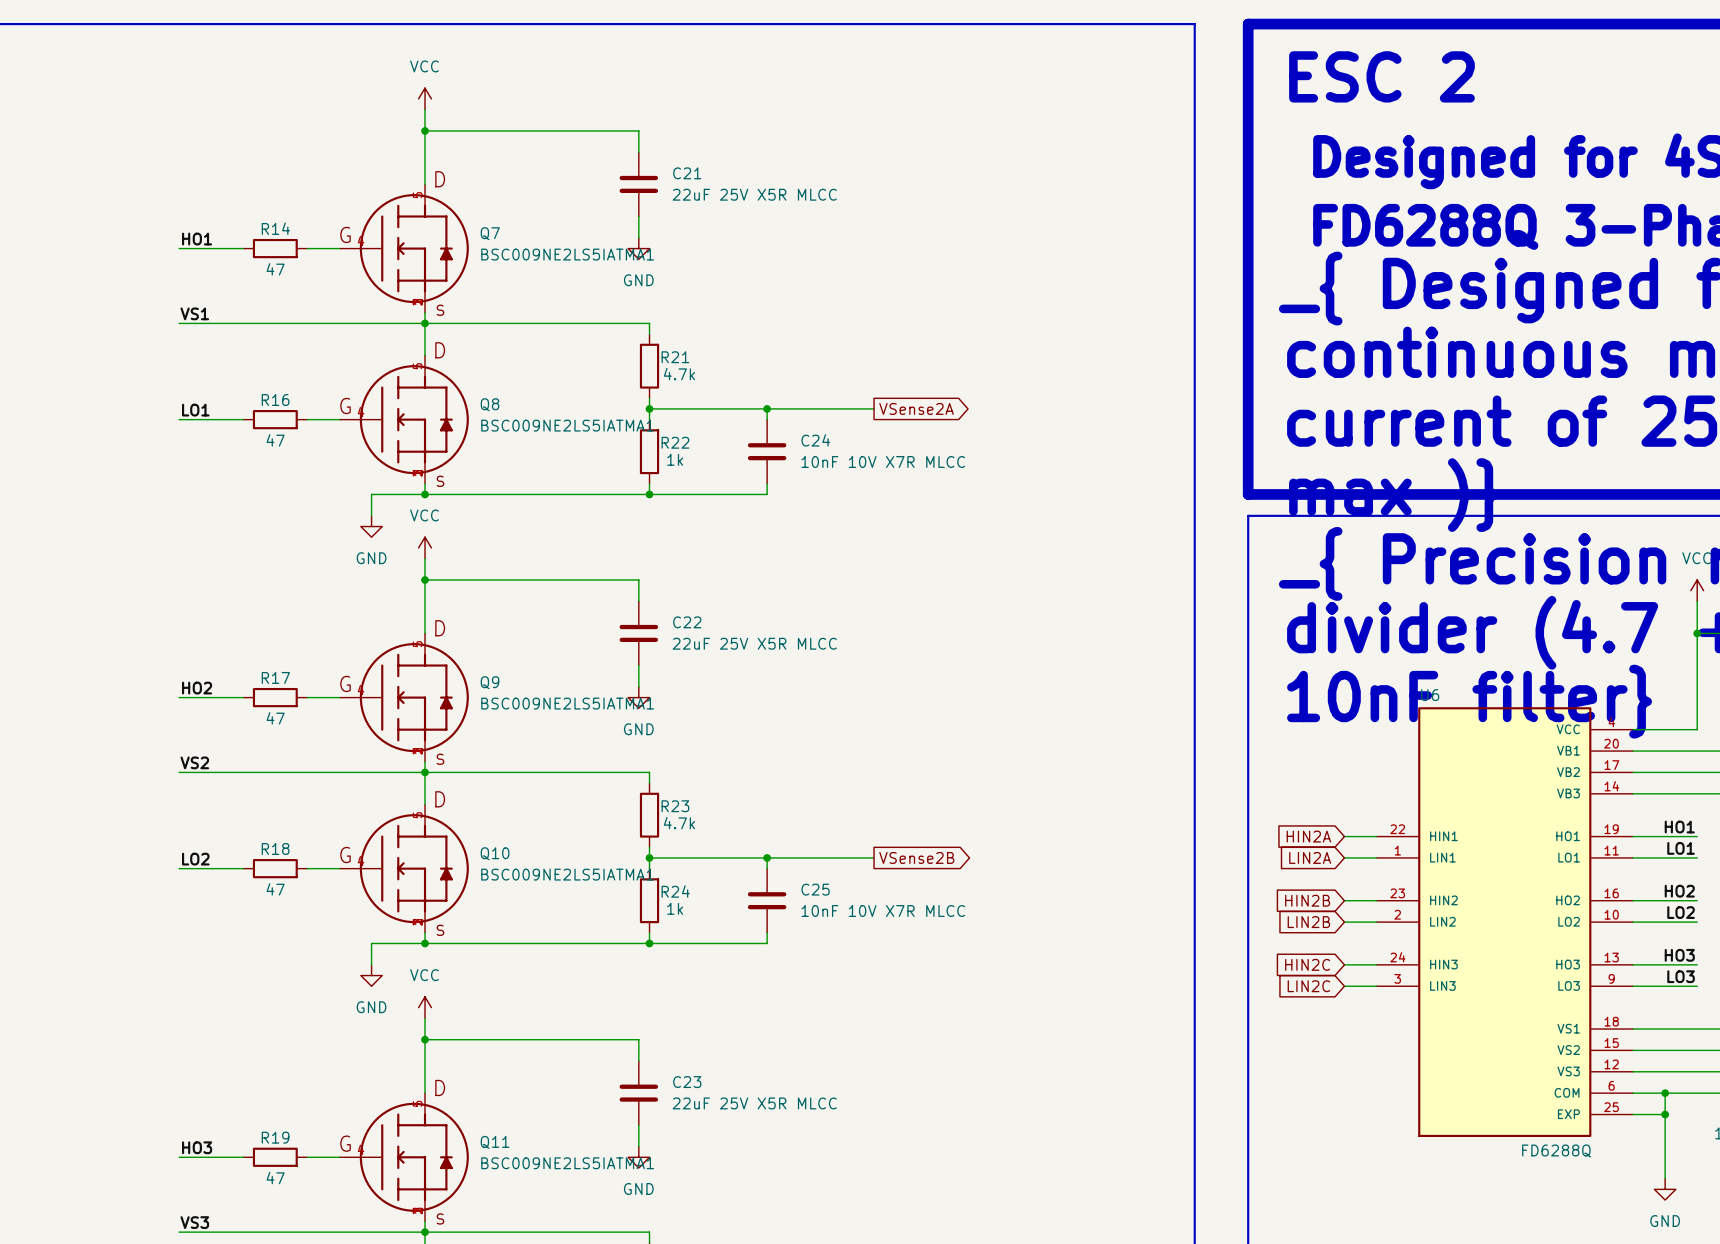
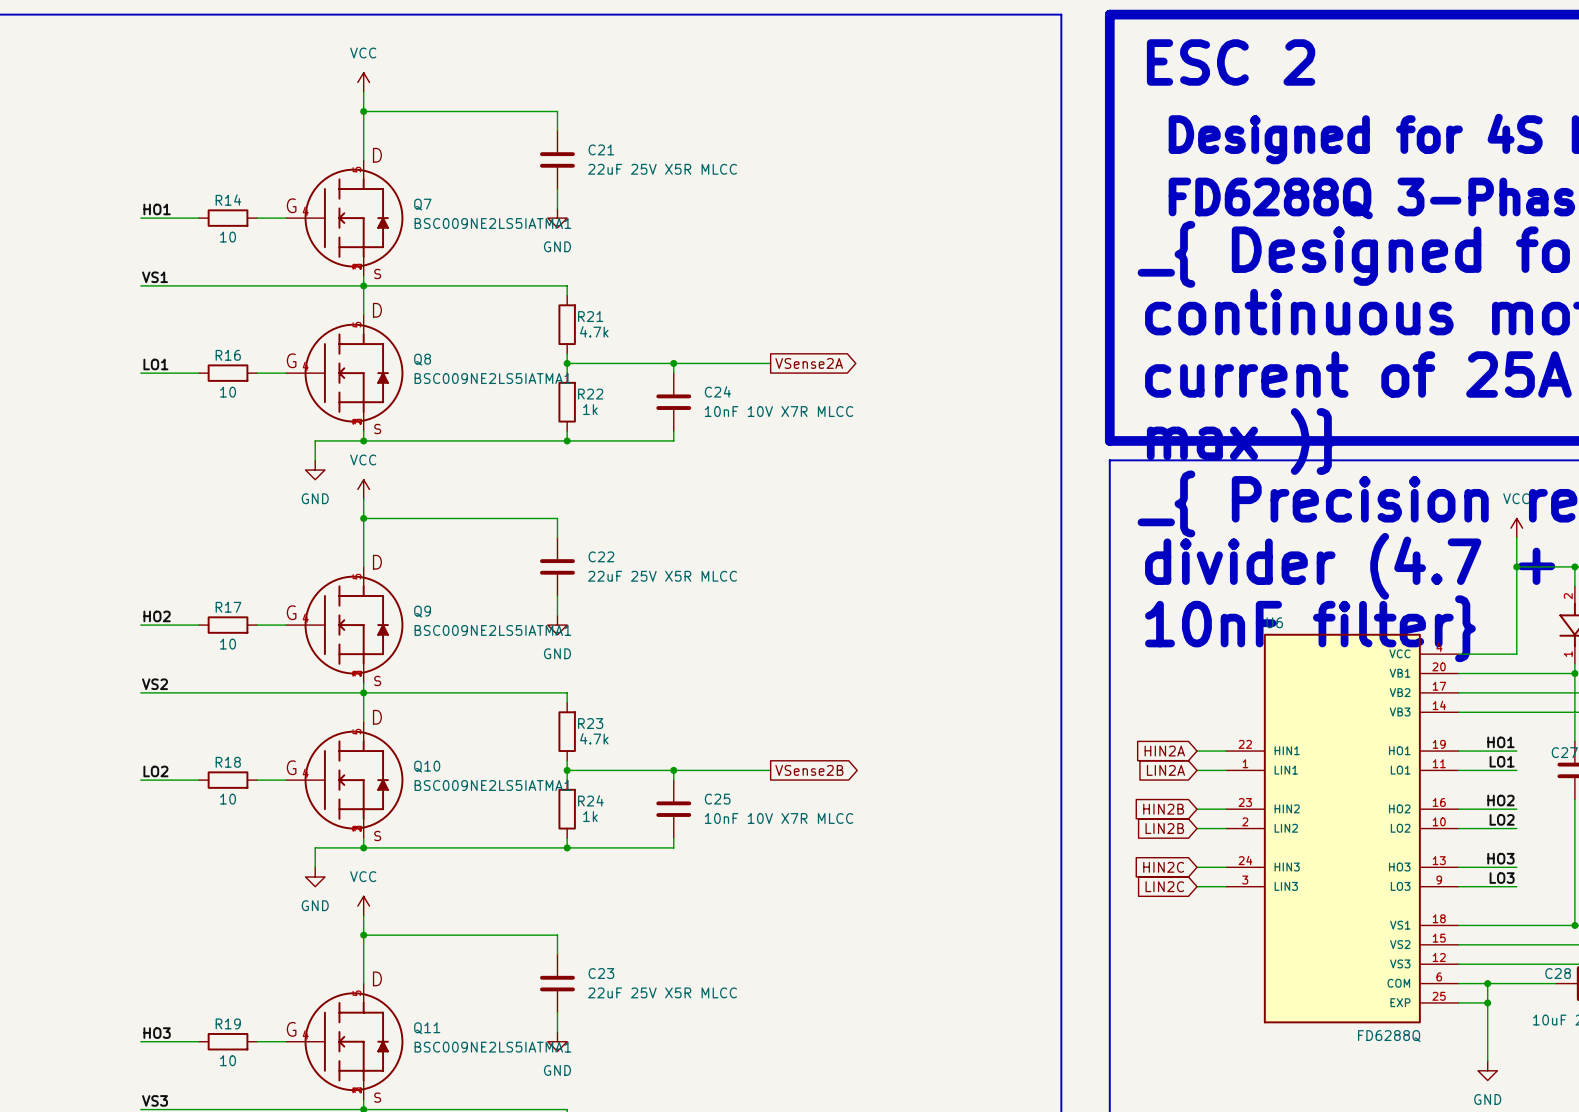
R14 value: 47 (275, 269) -> 10 (228, 237)
R16 value: 47 (275, 440) -> 10 (228, 392)
R17 value: 47 (275, 718) -> 10 (228, 644)
R18 value: 47 (275, 889) -> 10 (228, 799)
R19 value: 47 (275, 1178) -> 10 (228, 1060)

